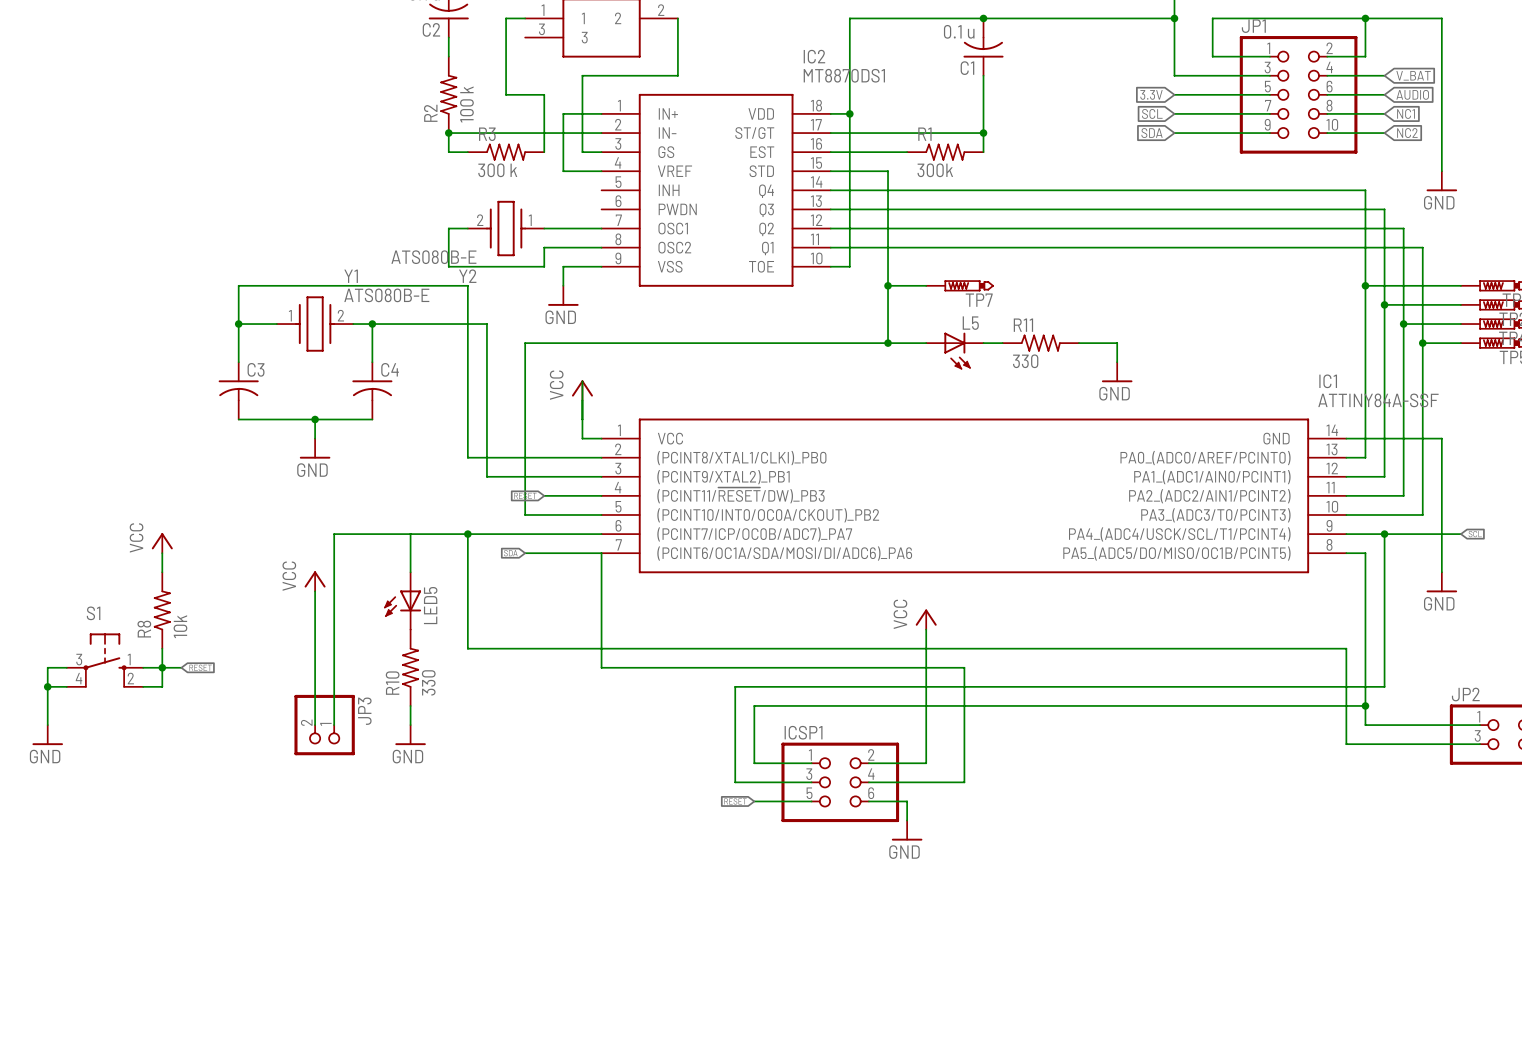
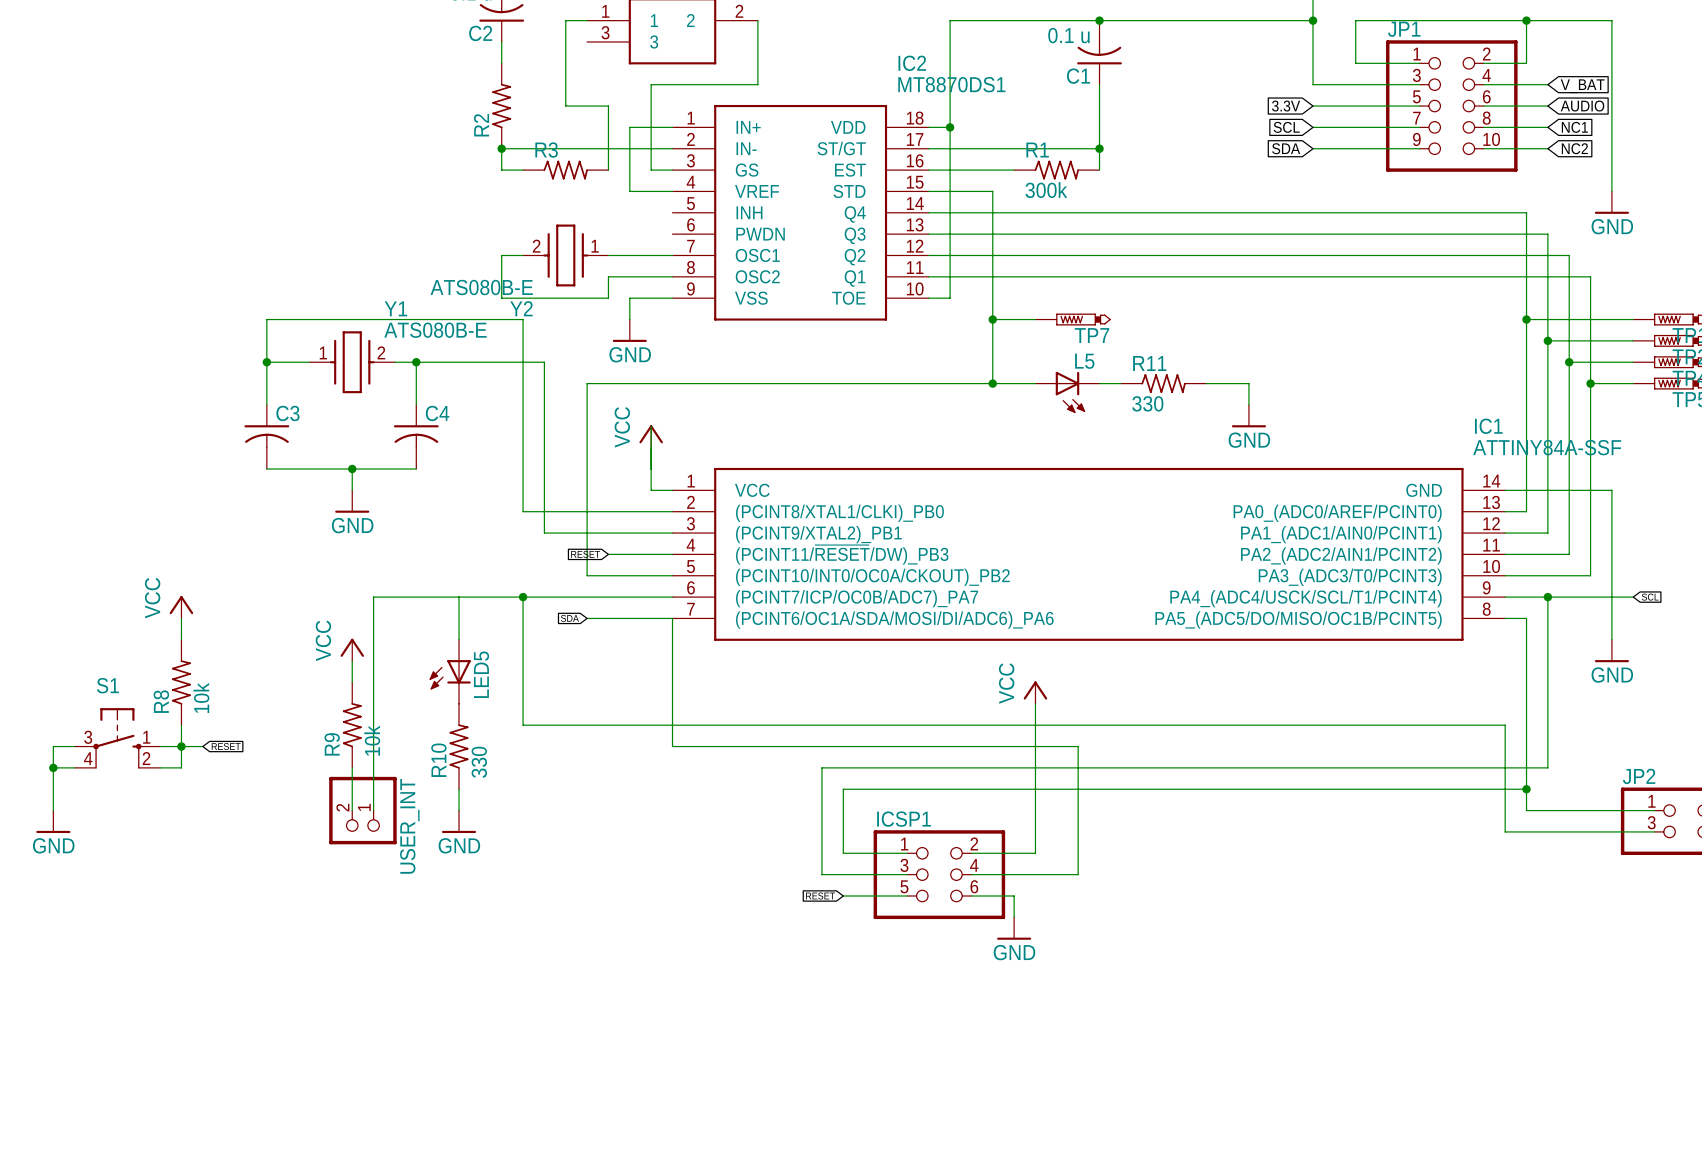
R2 value: 100 k (466, 104) -> none
R3 value: 300 k (497, 170) -> none
R9: none -> 10k (352, 725)
JP3 name: JP3 (364, 711) -> USER_INT (409, 826)

